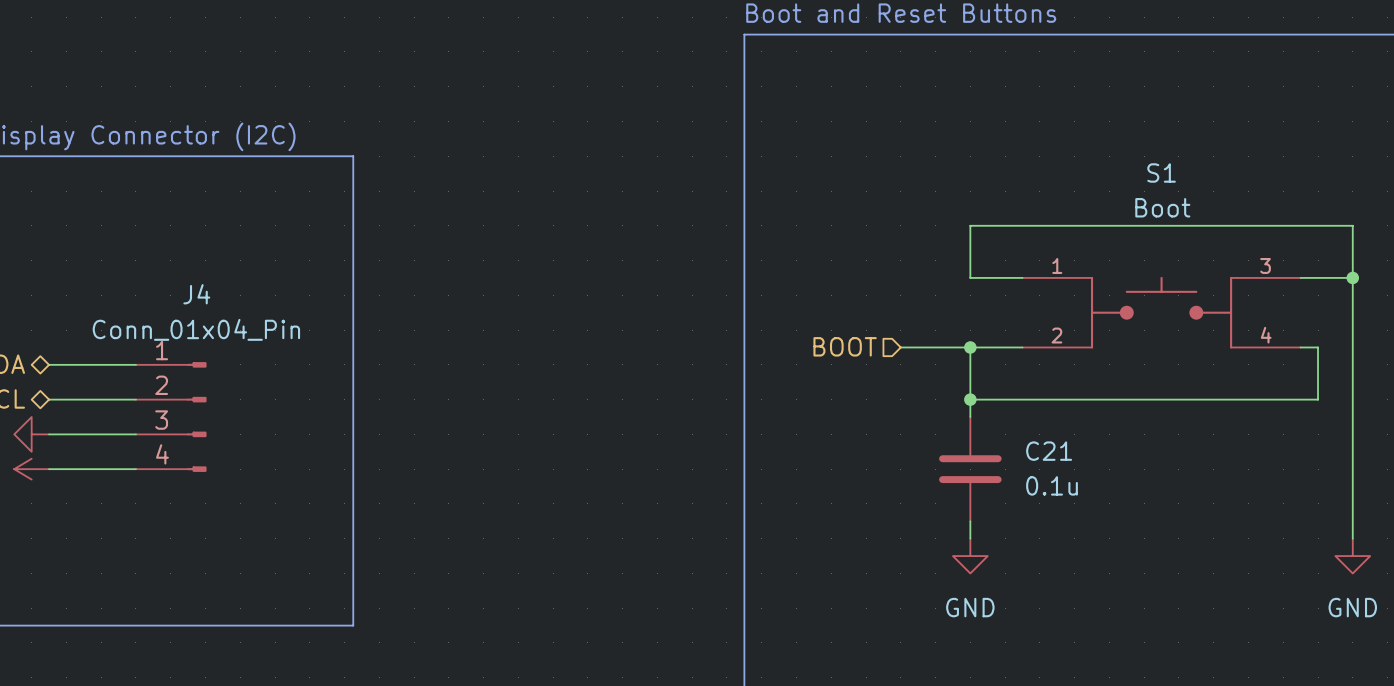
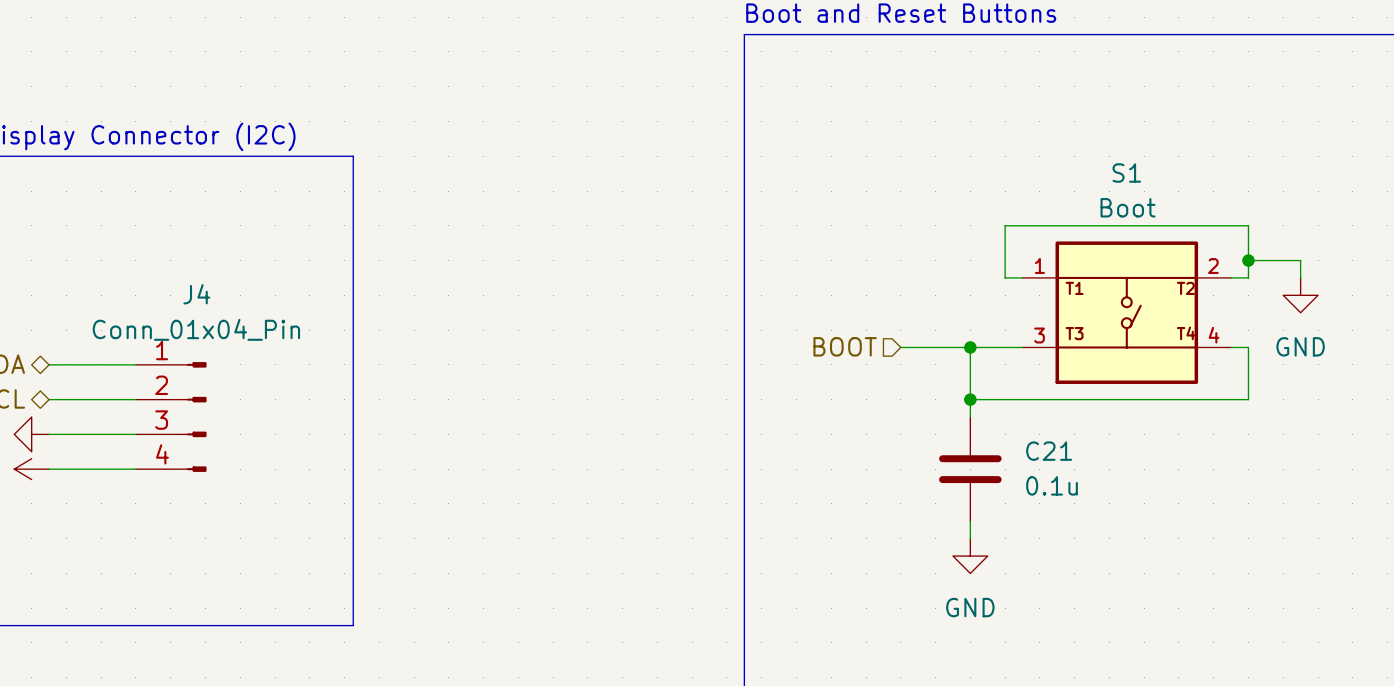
wire: (1005, 225) (970, 225) (970, 277) (1005, 277) -> (1005, 225) (1005, 277)
wire: (1248, 225) (1352, 225) (1352, 538) -> (1248, 225) (1248, 277) (1231, 277)
junction: none -> (1248, 260)
S1 symbol: [1022, 276, 1301, 349] -> [1022, 241, 1232, 384]
wire: (1300, 277) (1352, 277) -> (1300, 277) (1300, 260) (1248, 260)
junction: (1352, 277) -> none
wire: (1300, 347) (1318, 347) (1318, 399) (1248, 399) -> (1231, 347) (1248, 347) (1248, 399)
power symbol position: GND (1352, 556) -> GND (1300, 295)

